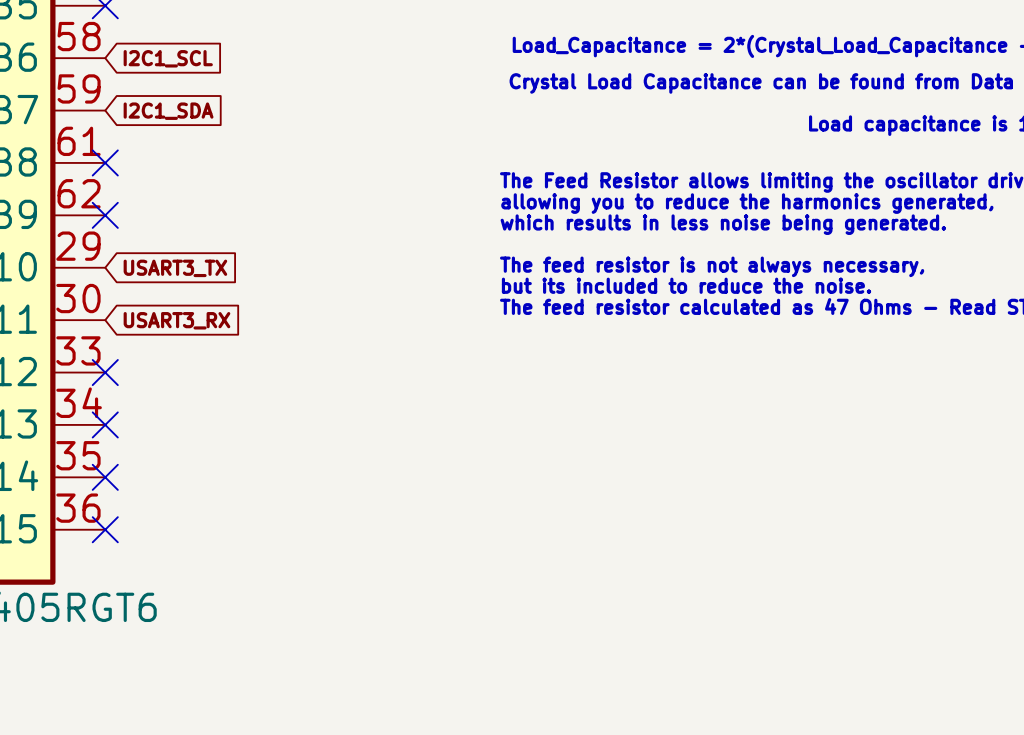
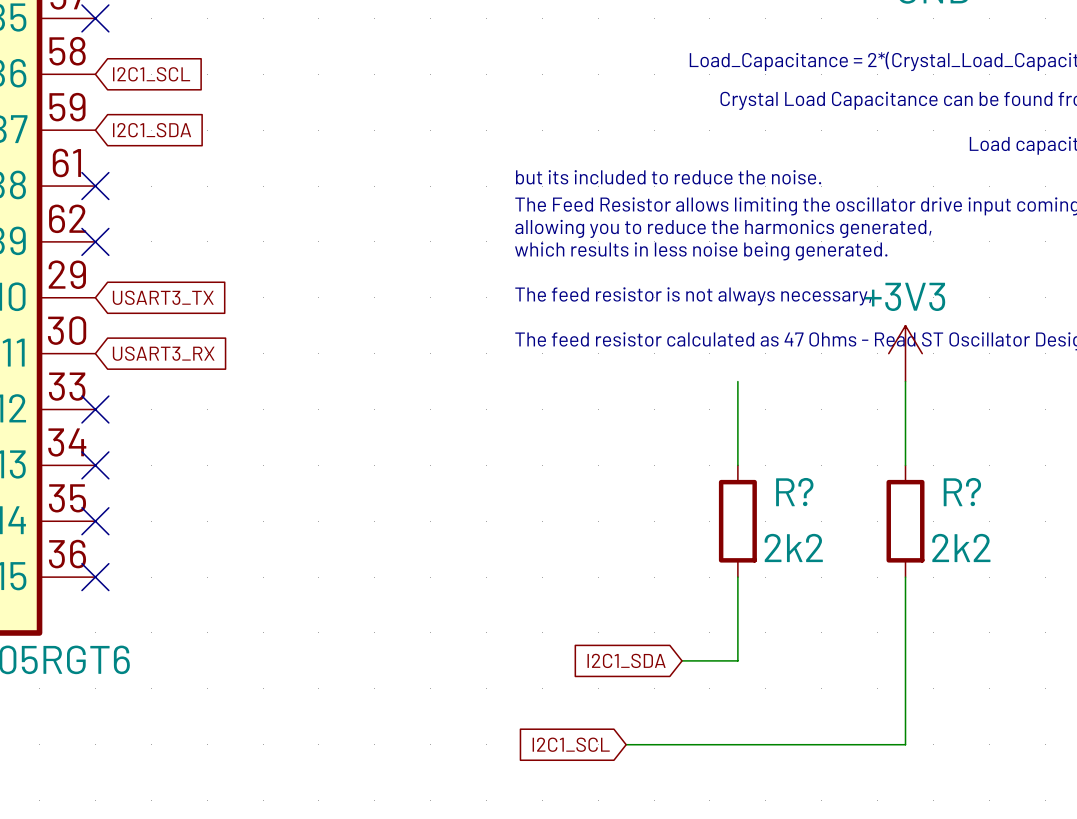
text position: but its included to reduce the noise. (686, 285) -> but its included to reduce the noise. (668, 177)
power symbol: none -> +3V3 (905, 353)
wire: none -> (737, 381) (737, 465)
wire: none -> (905, 381) (905, 465)
R?: none -> 2k2 (737, 521)
R?: none -> 2k2 (905, 521)
wire: none -> (737, 577) (737, 660) (682, 660)
wire: none -> (905, 577) (905, 744) (626, 744)
global label: none -> I2C1_SDA (626, 660)
global label: none -> I2C1_SCL (571, 744)

